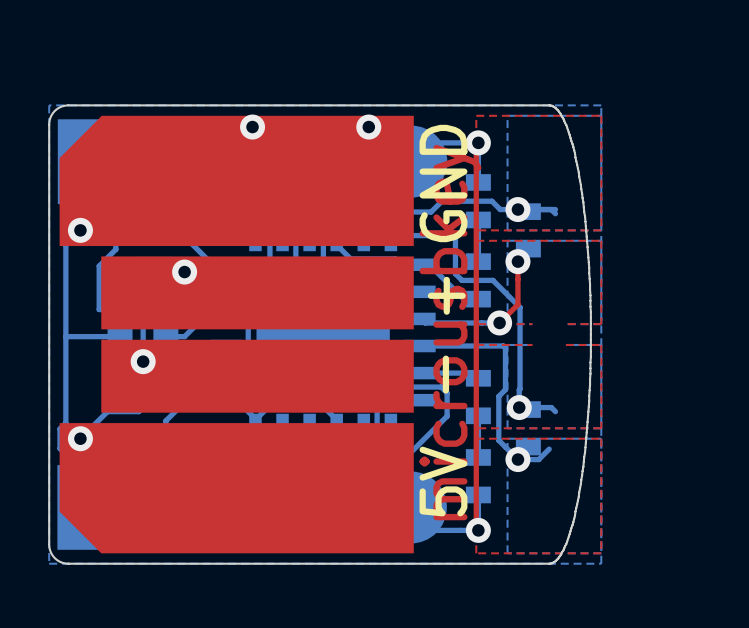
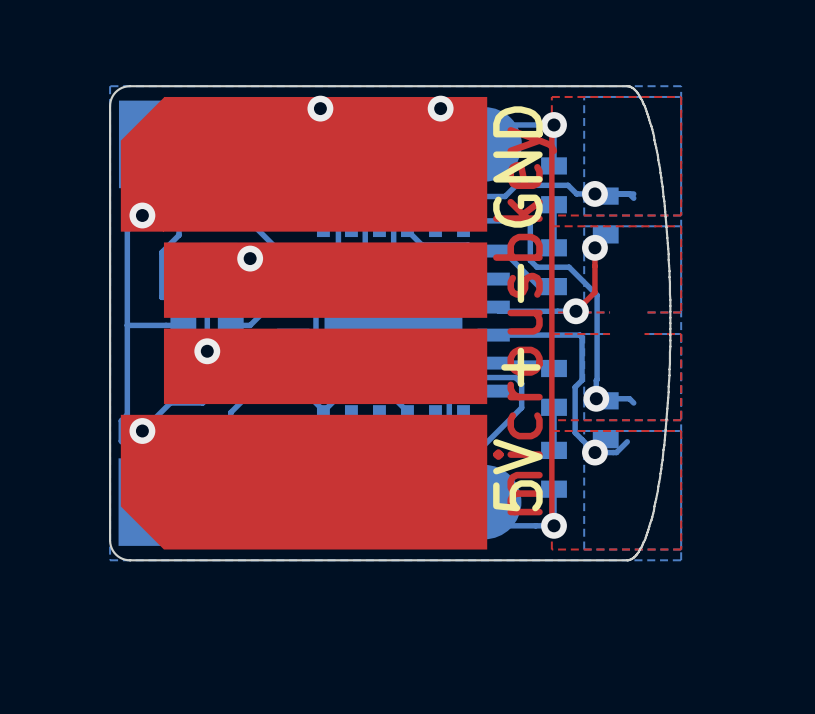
part text: + (446, 295) -> - (520, 283)
part text: - (445, 374) -> none
part text: none -> + (520, 367)

